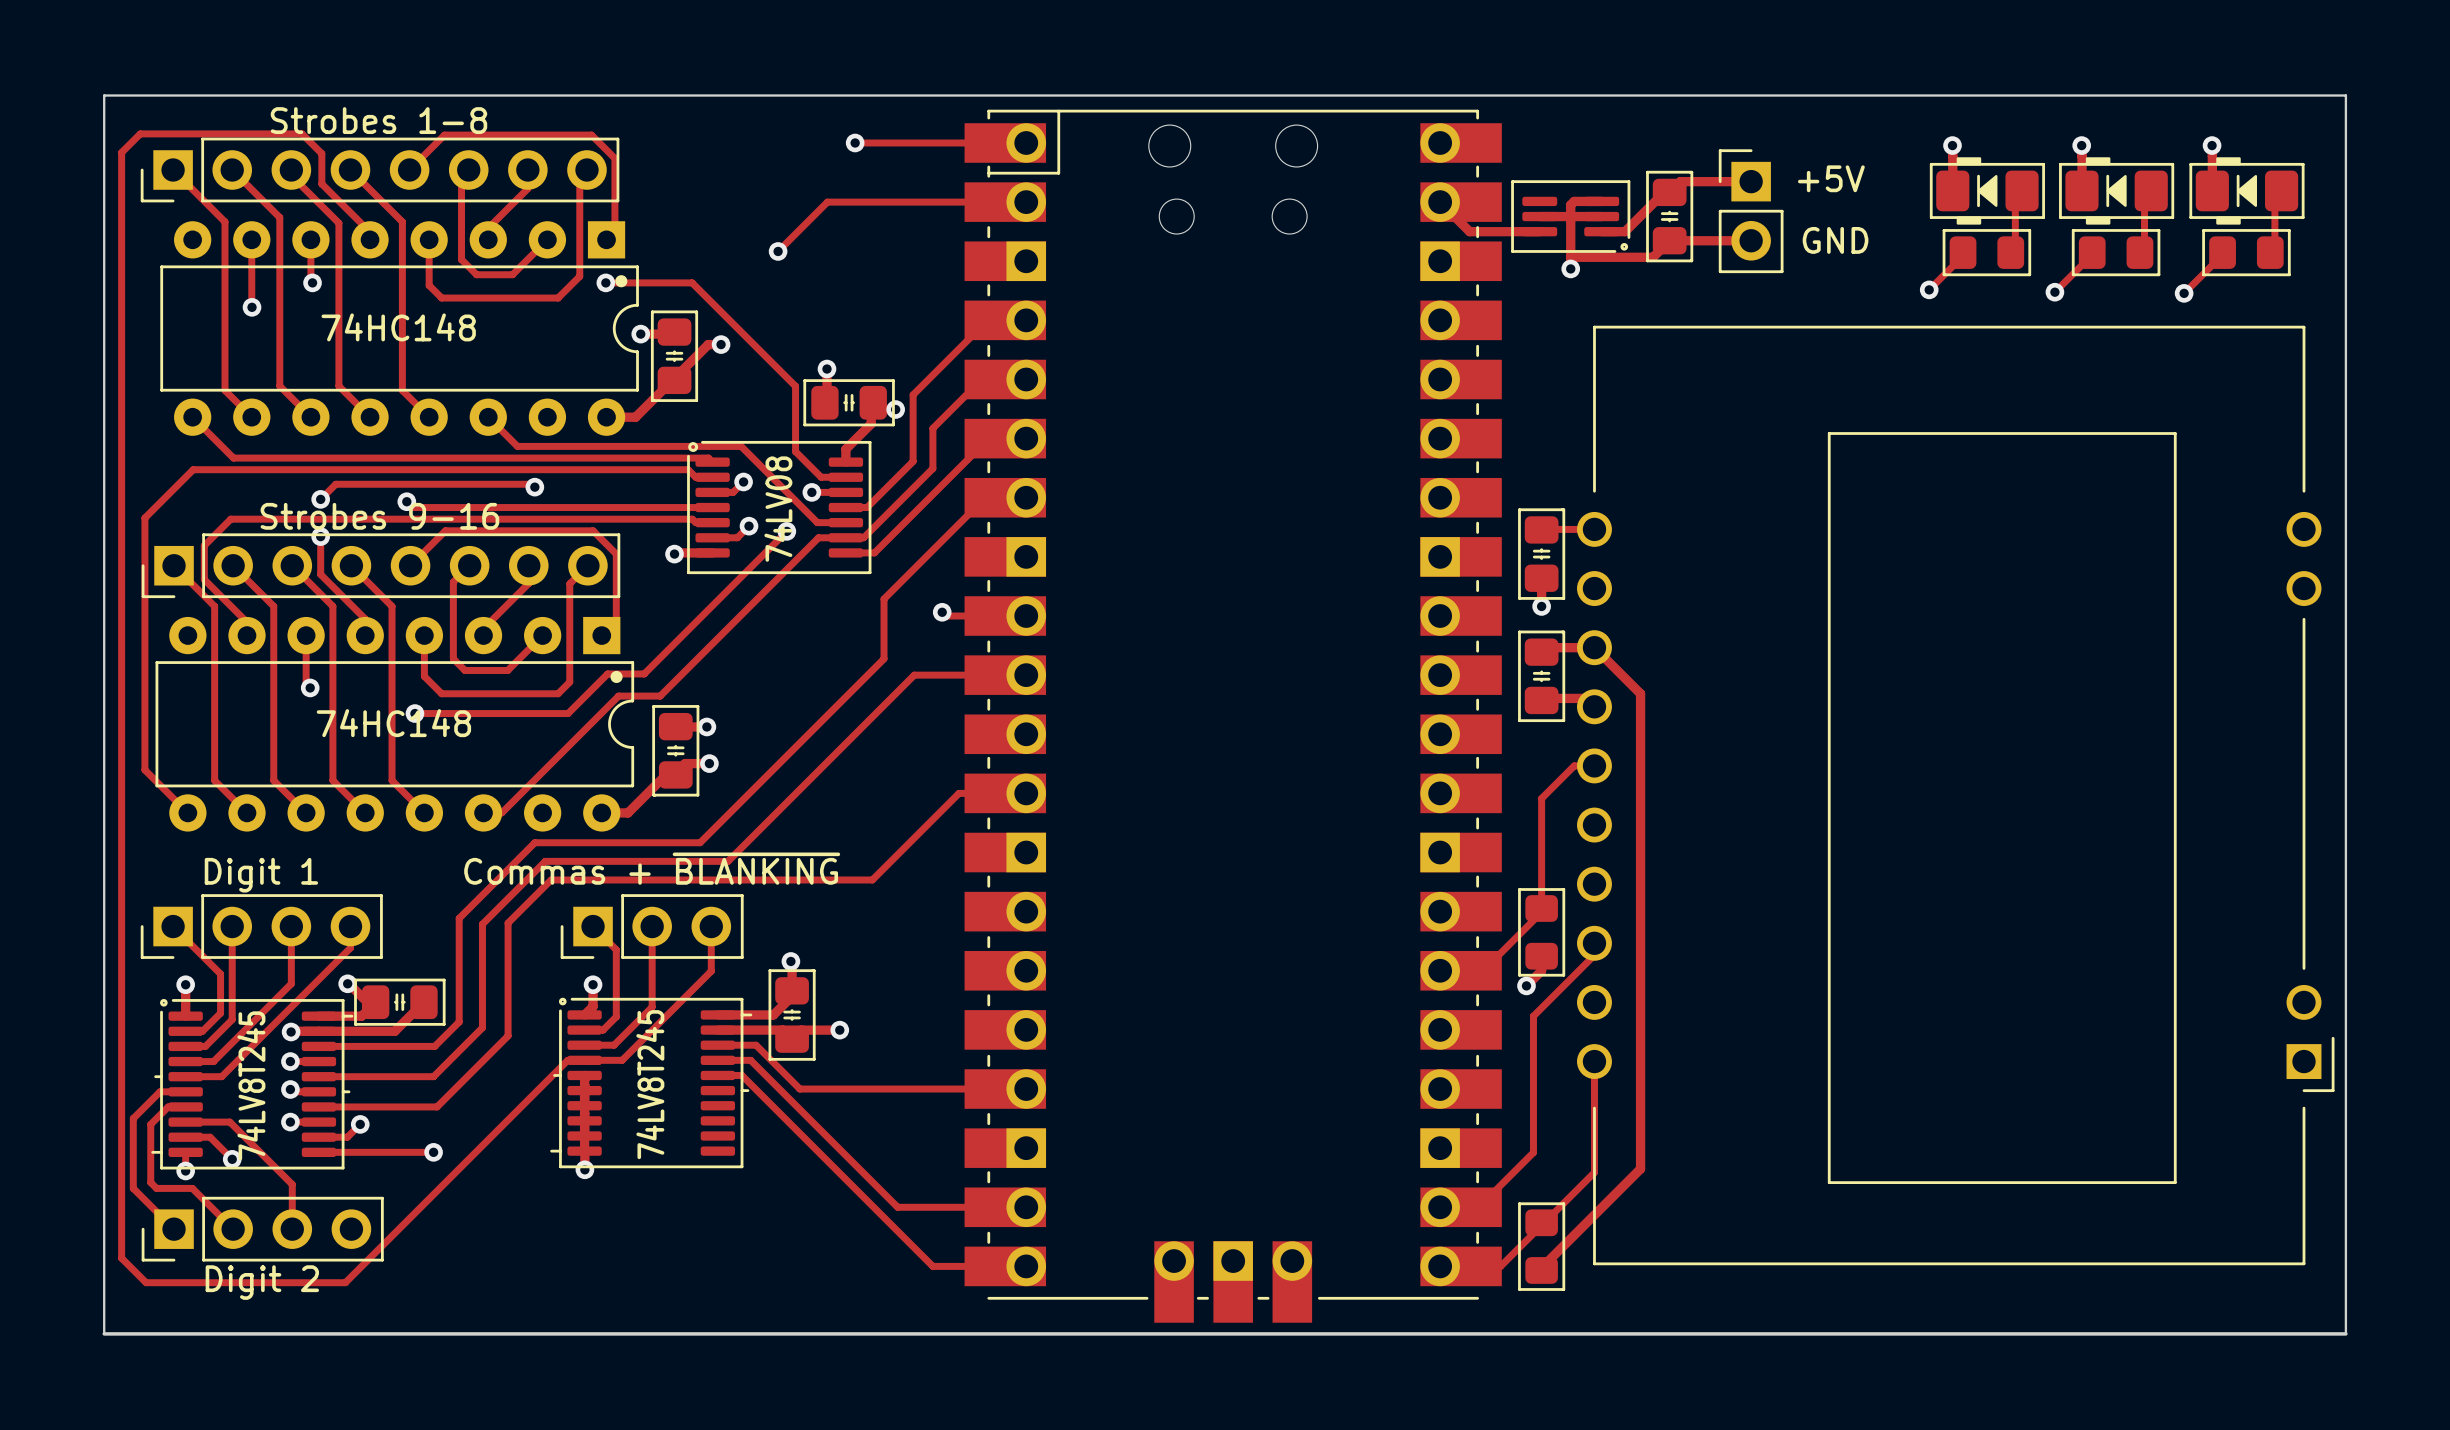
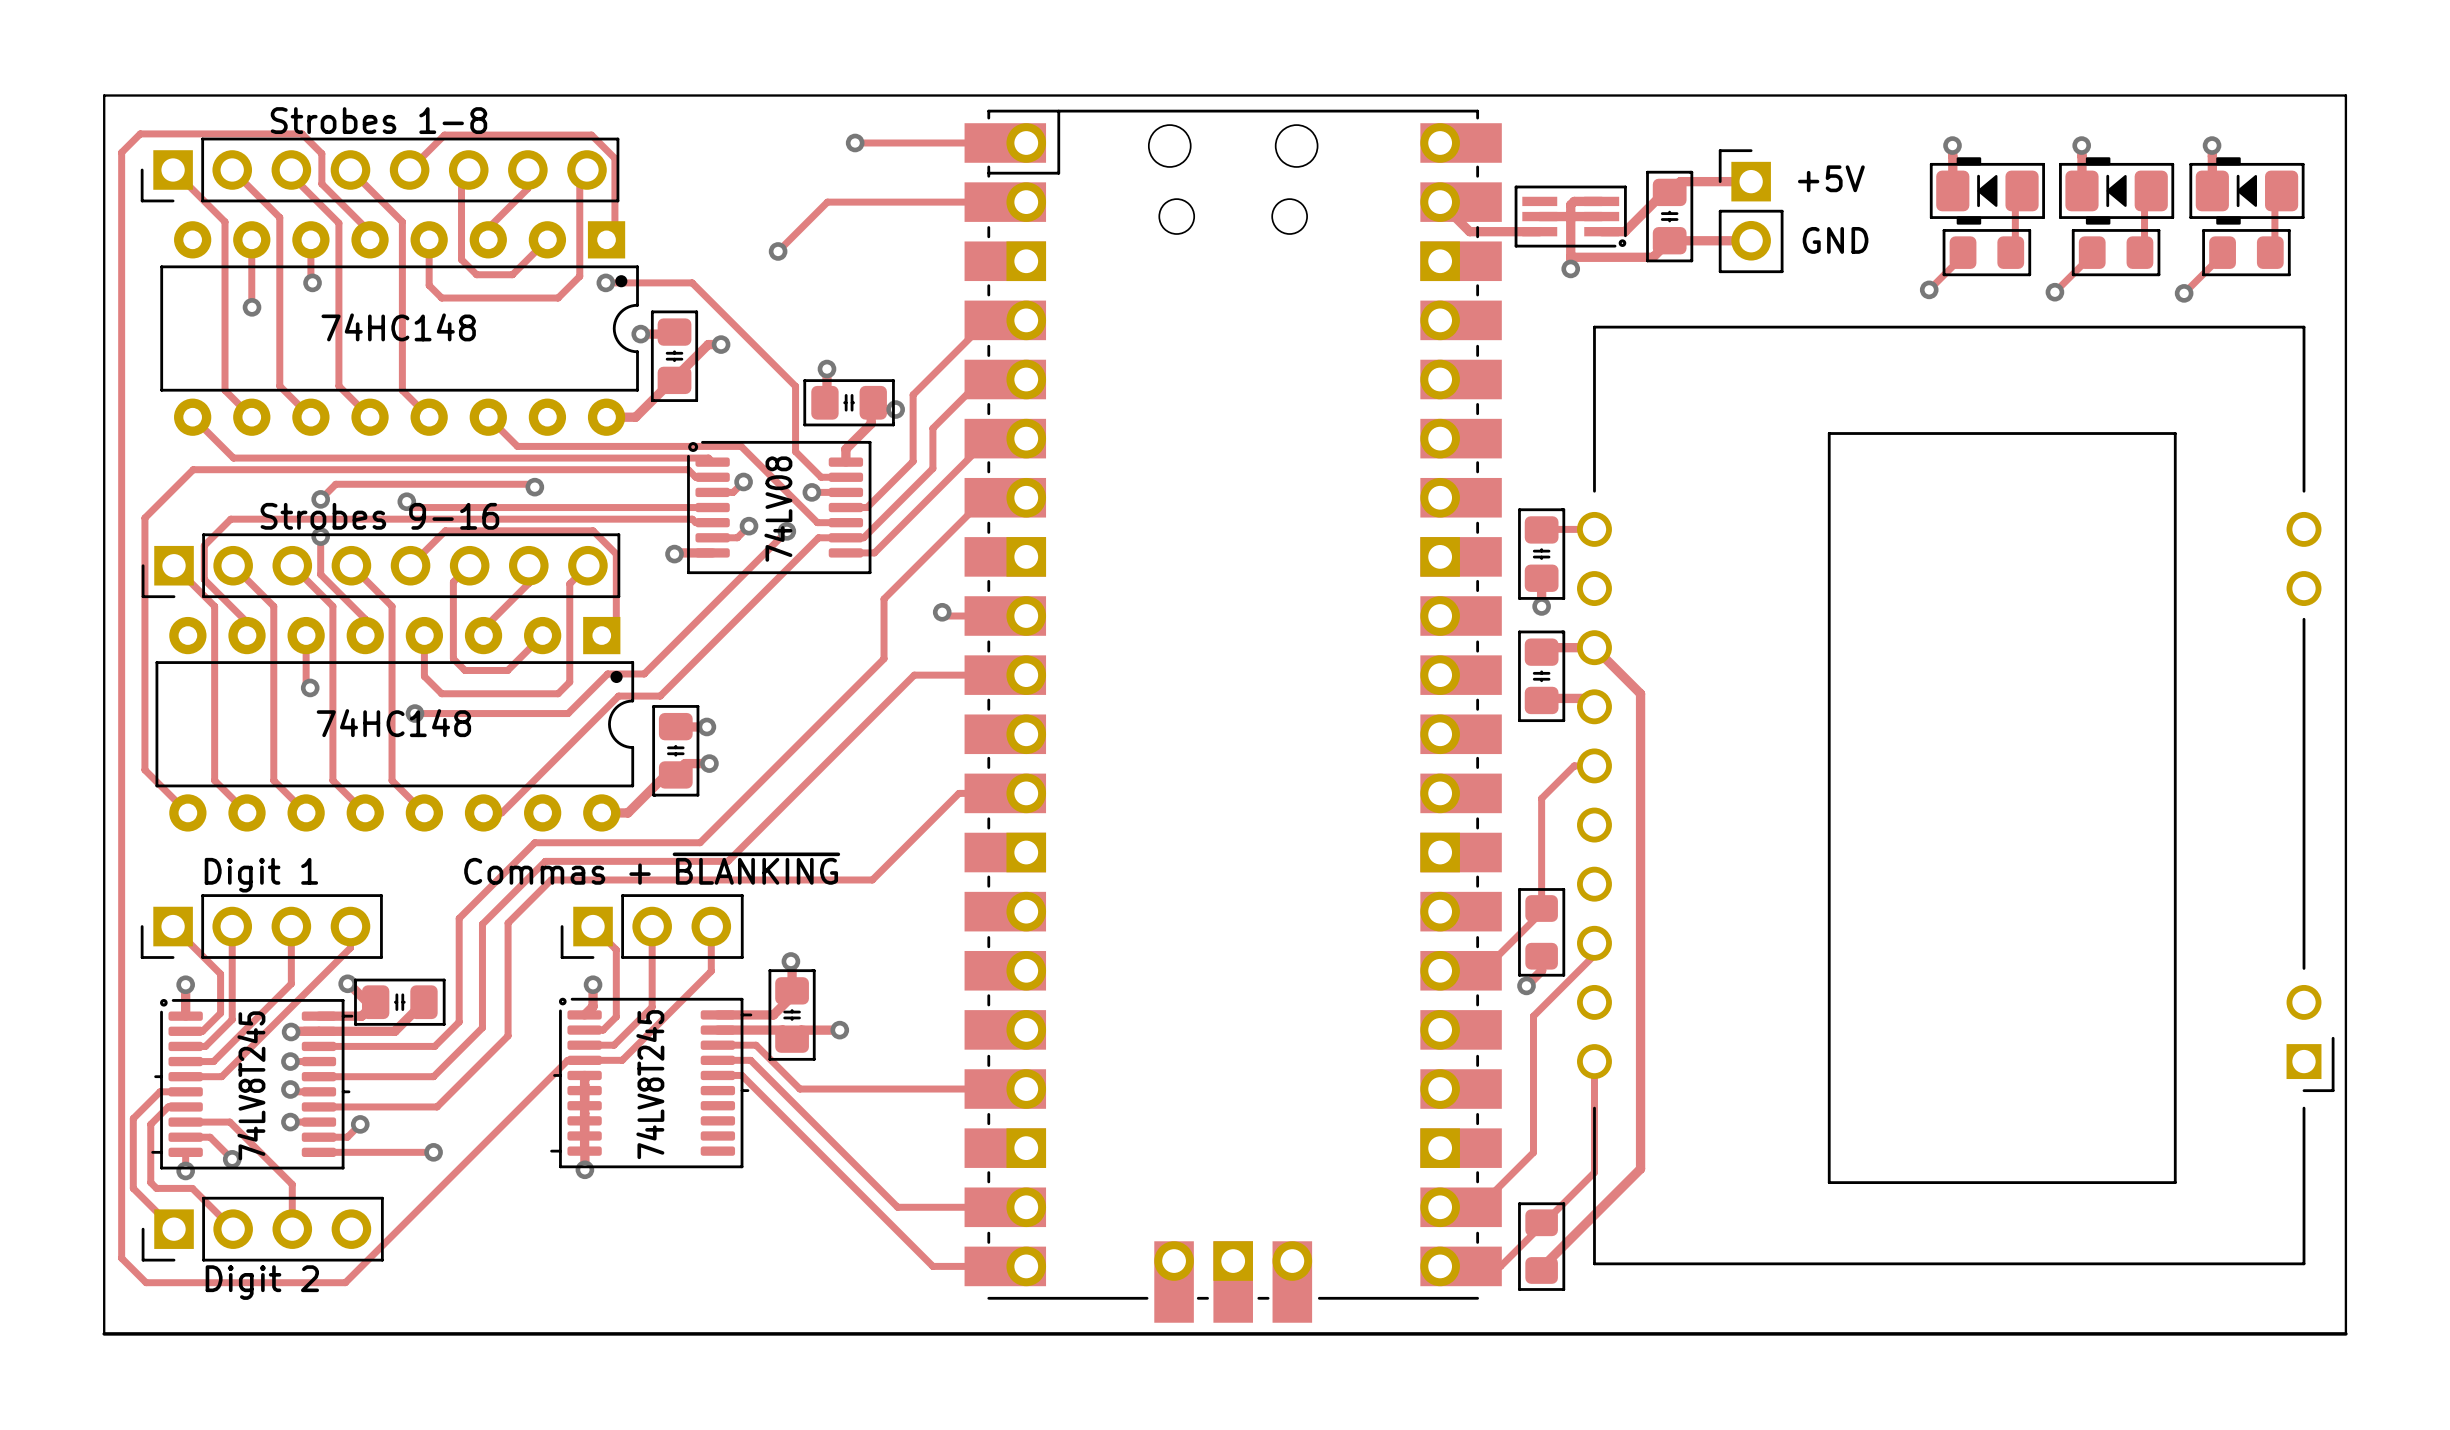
part footprint: [1511, 180, 1631, 253] -> [1514, 185, 1627, 248]

